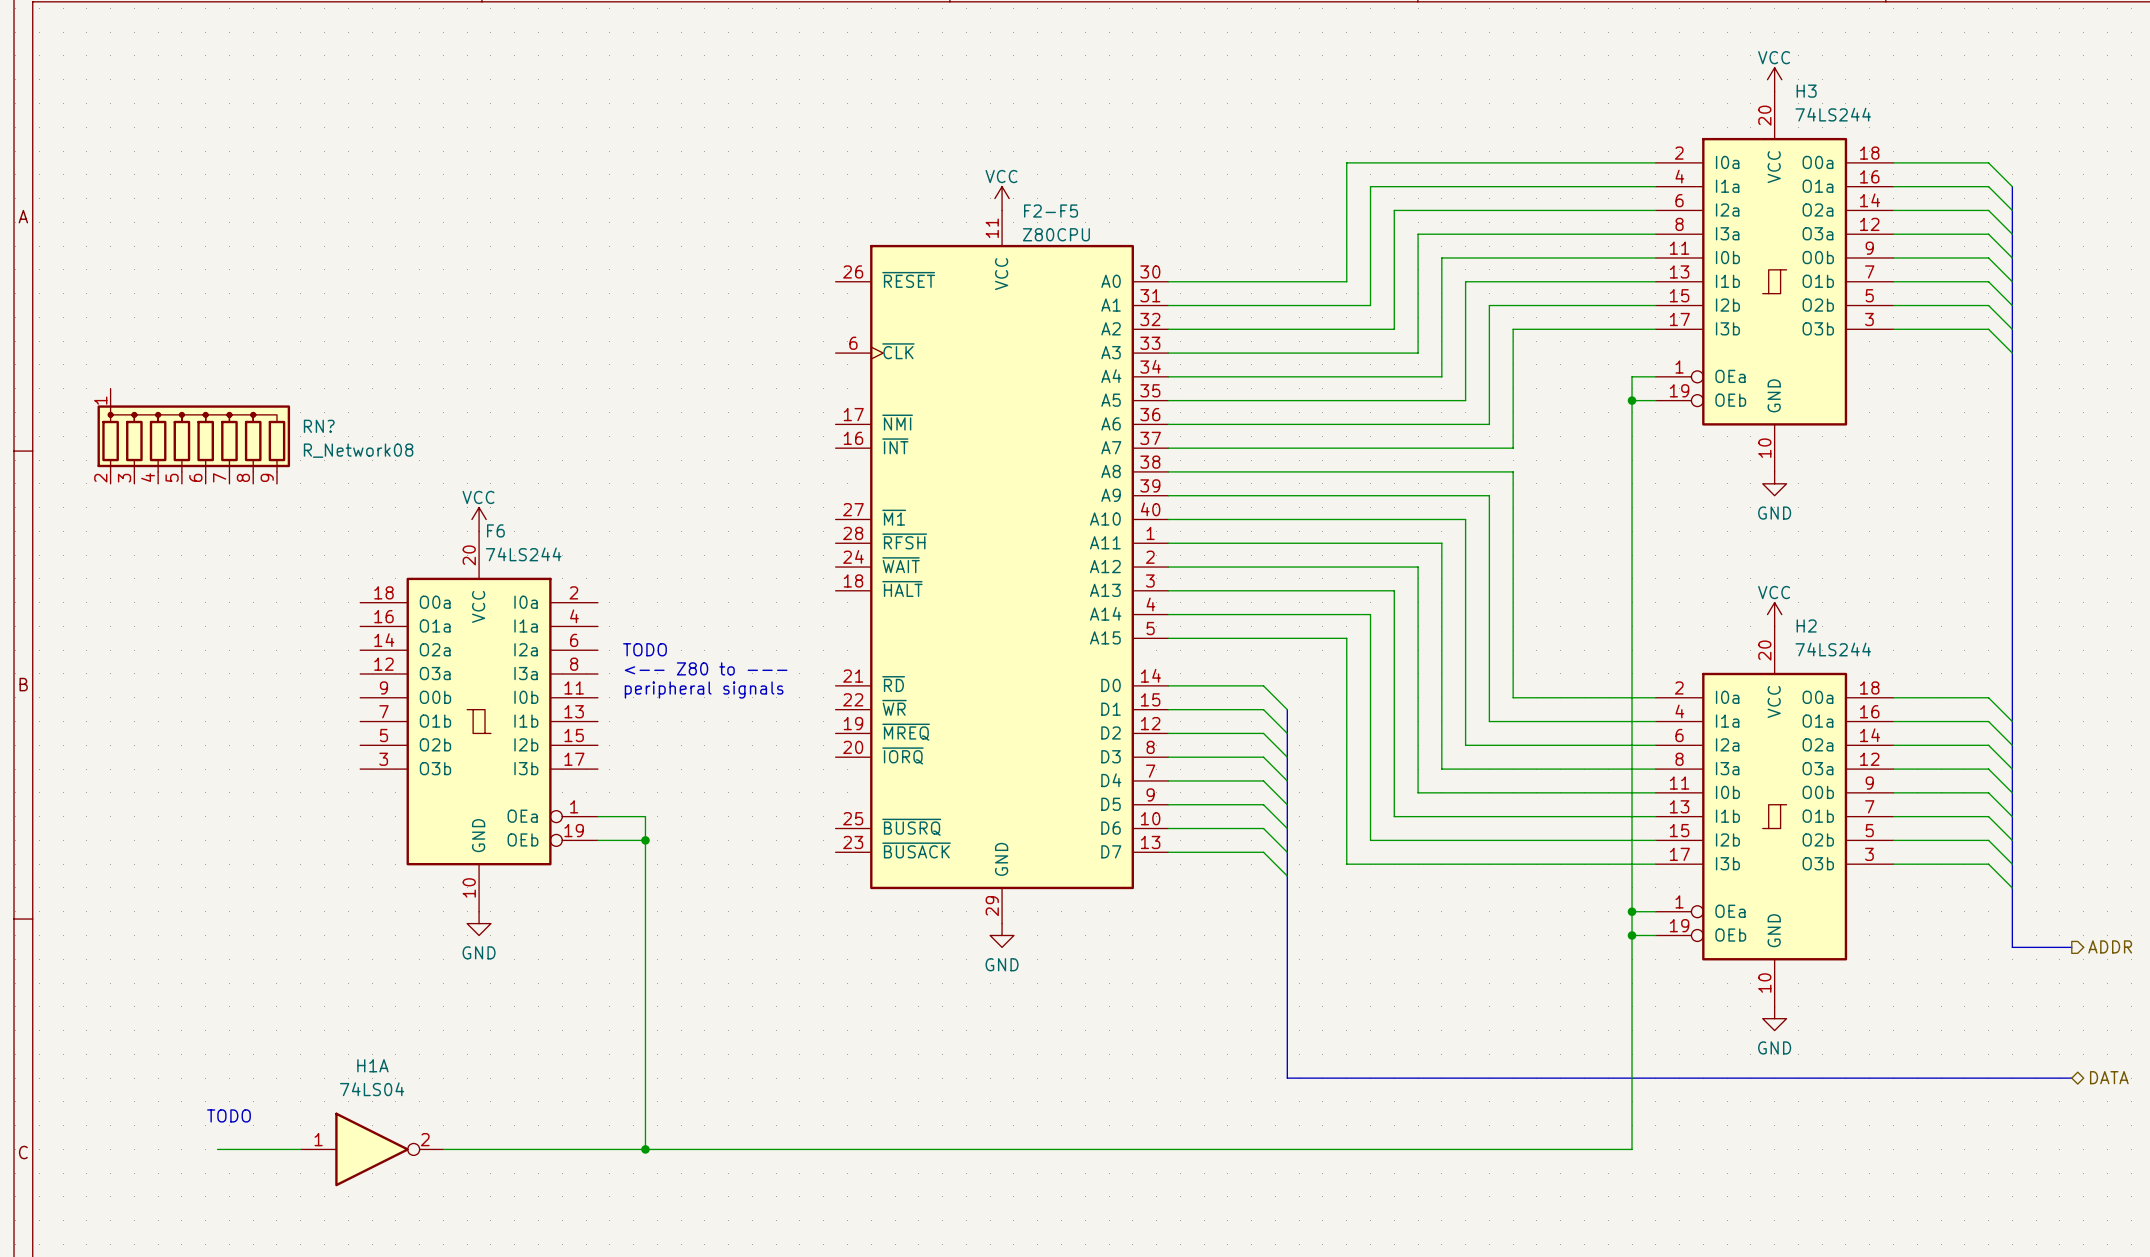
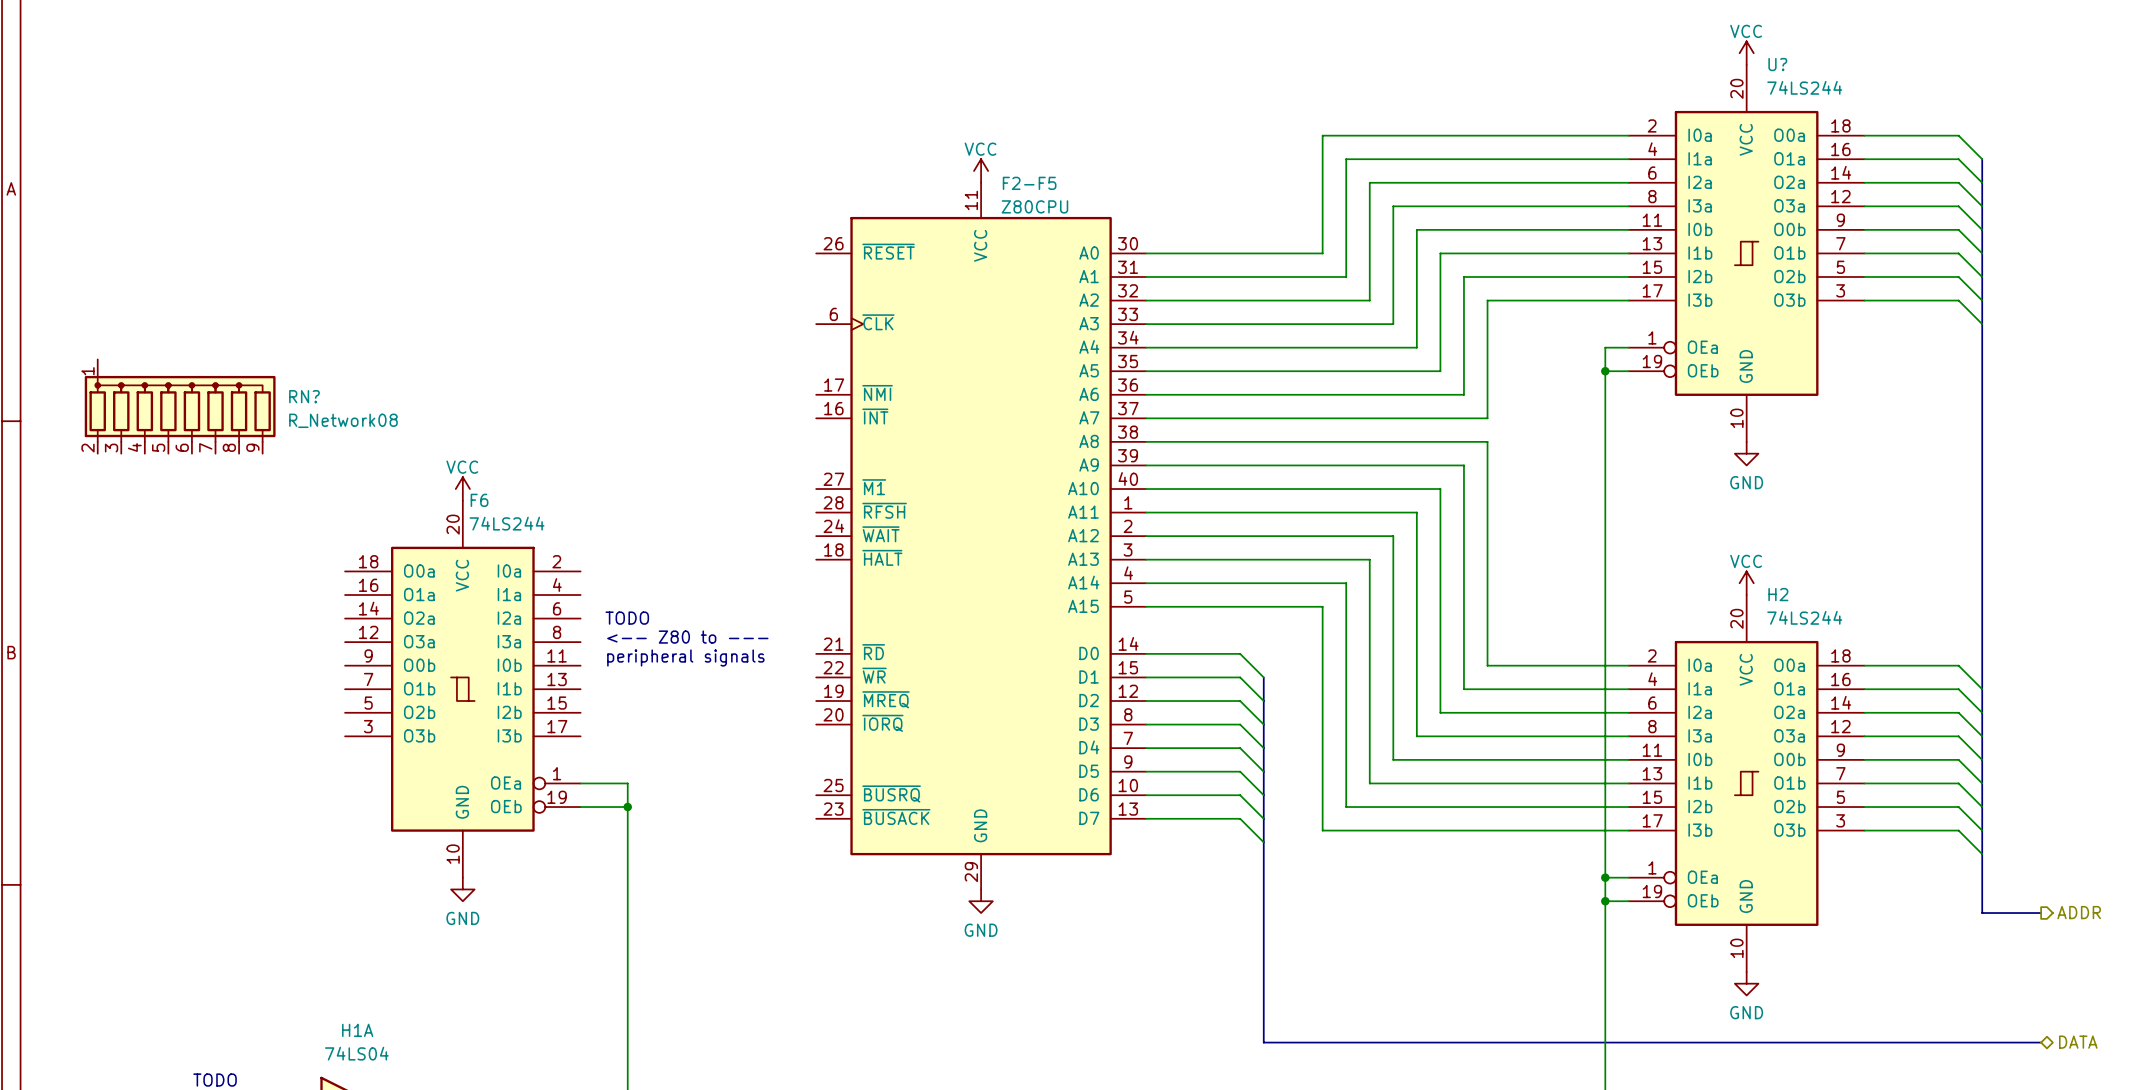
H3 name: H3 (1806, 91) -> U? (1777, 64)

